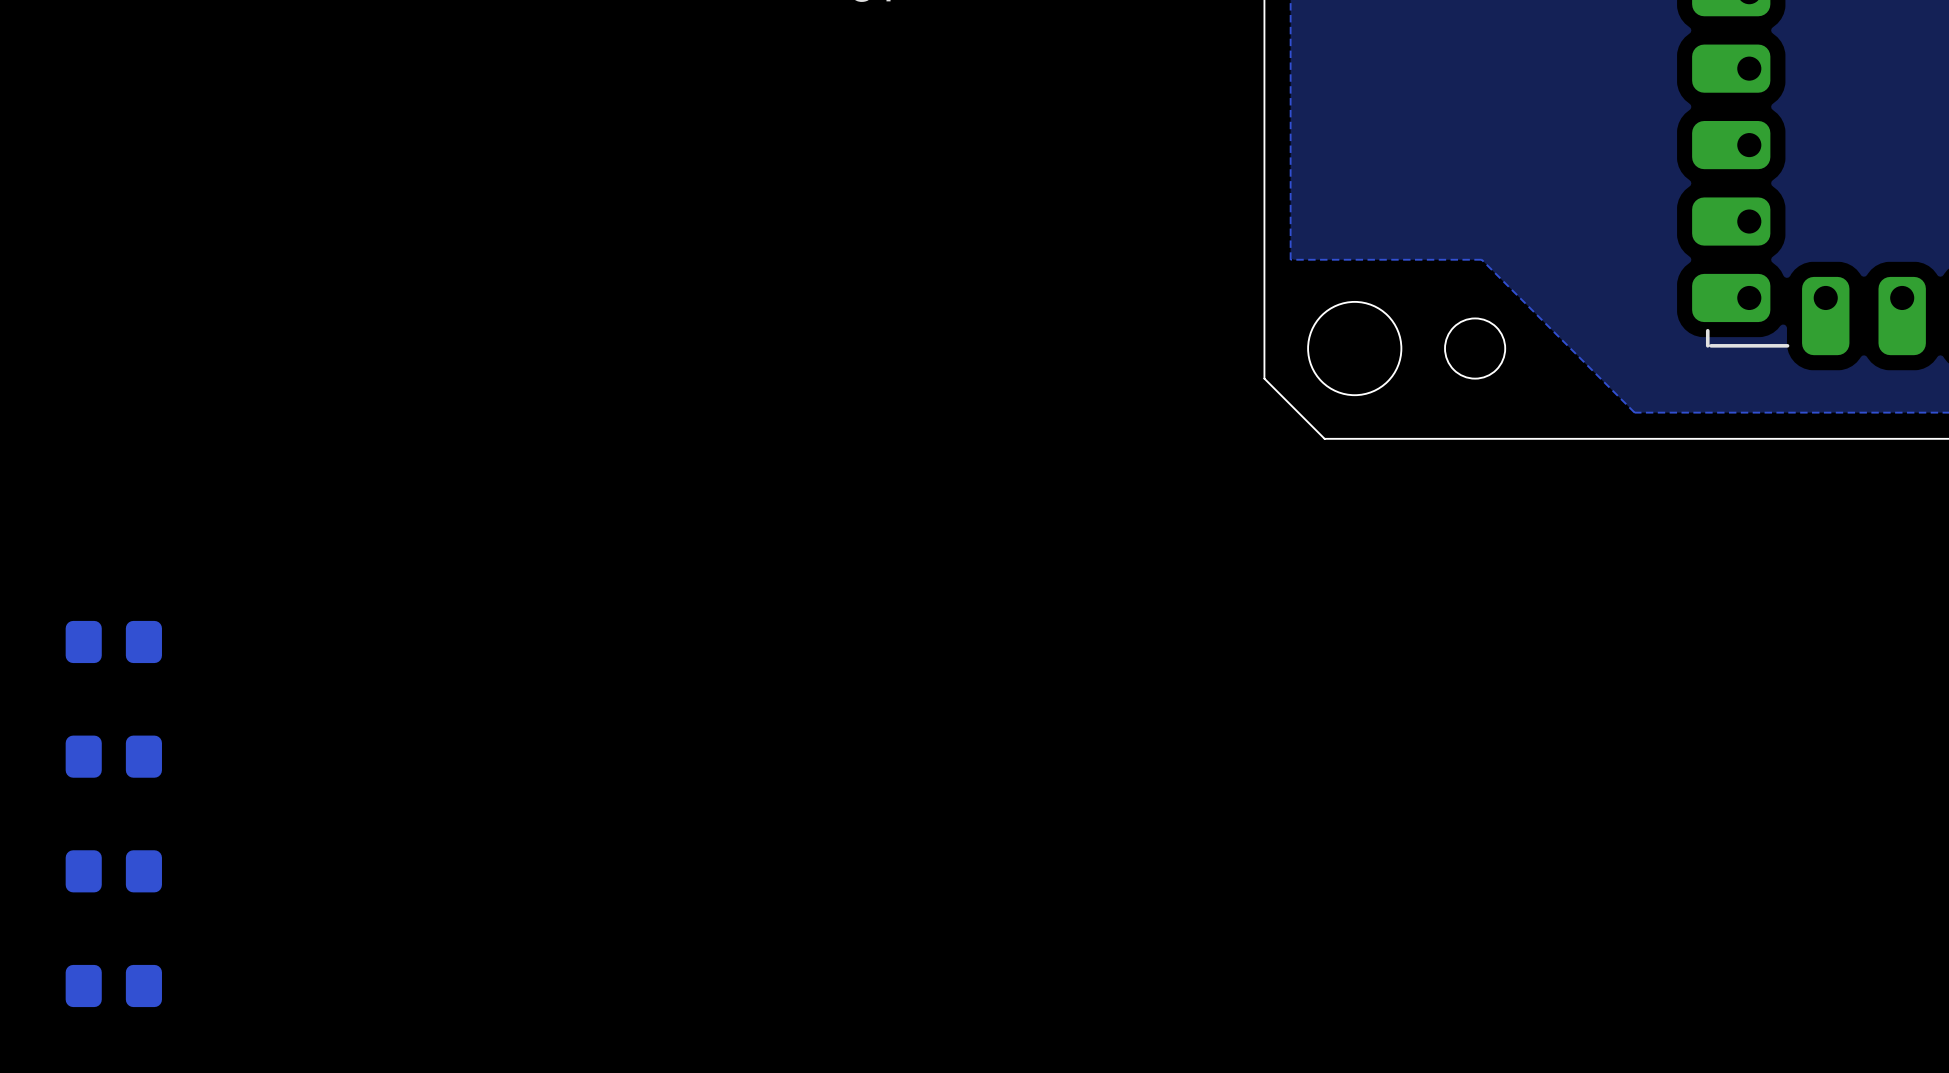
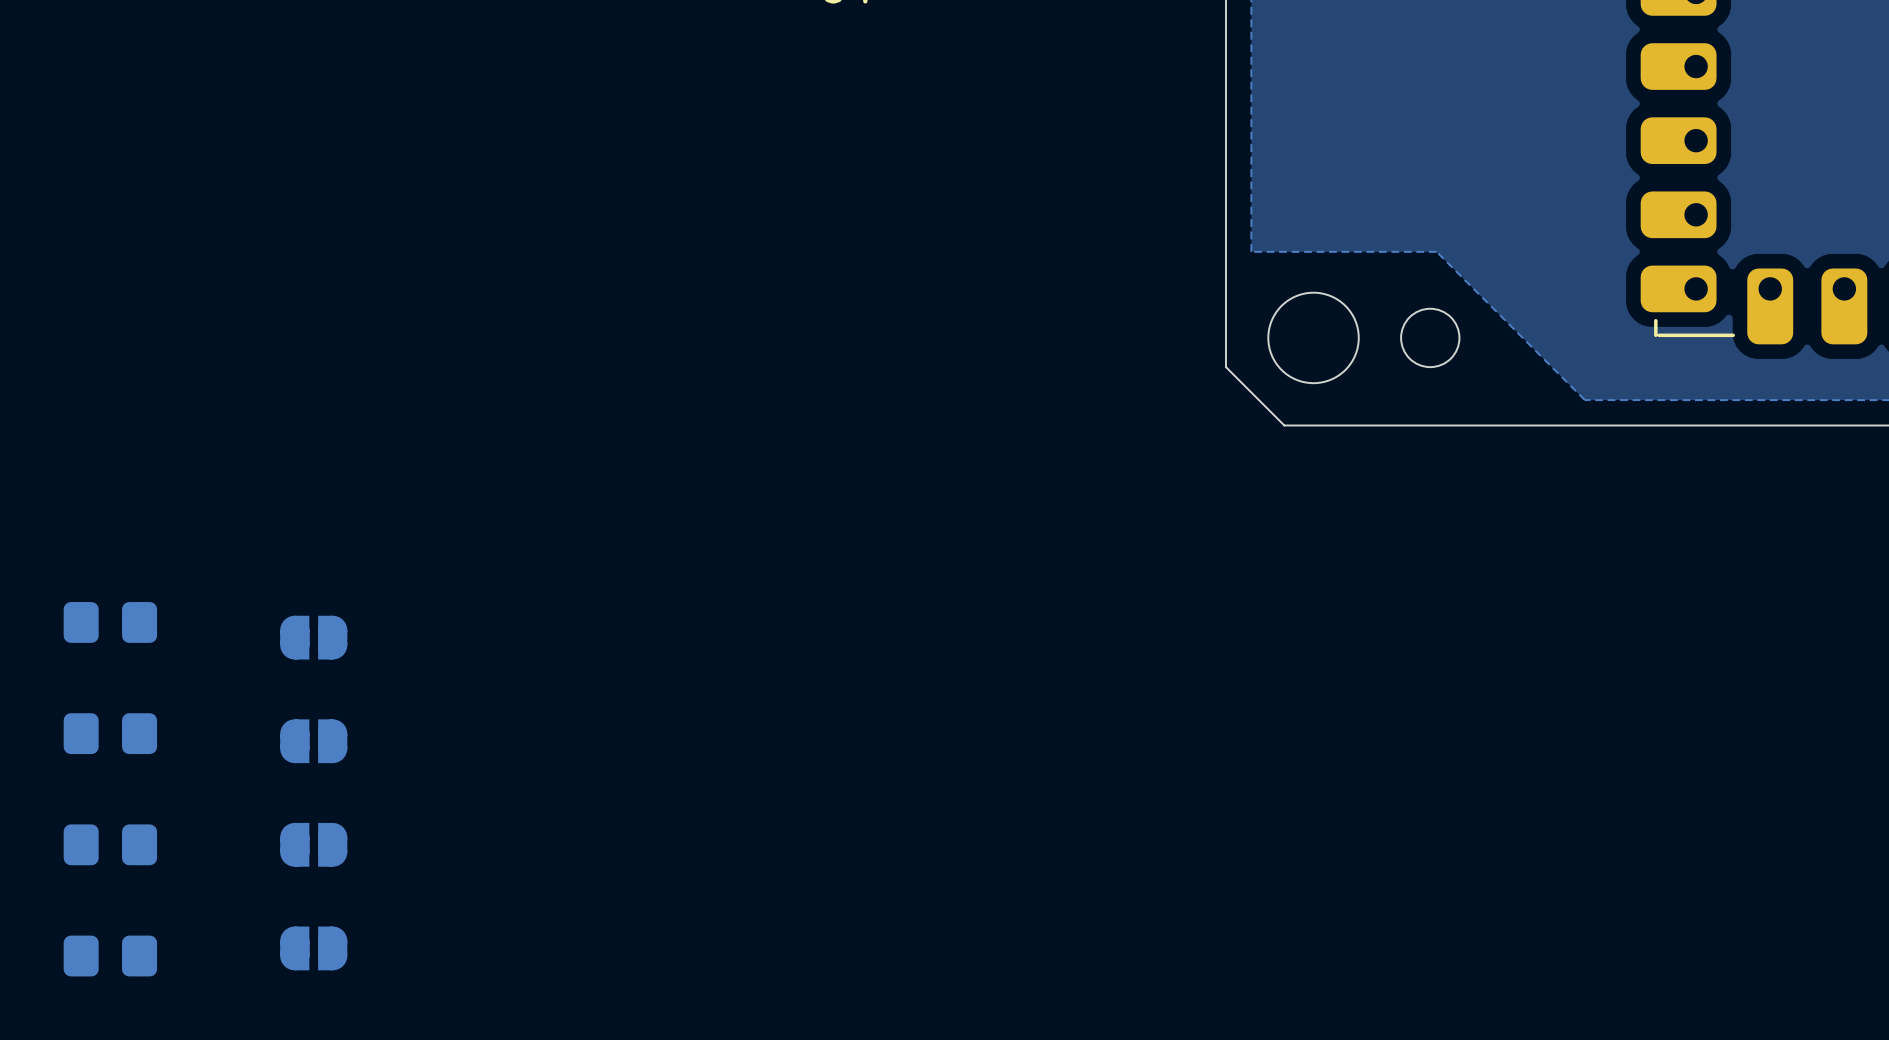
part: none -> (313, 637)
part: none -> (313, 741)
part: none -> (313, 844)
part: none -> (313, 948)

